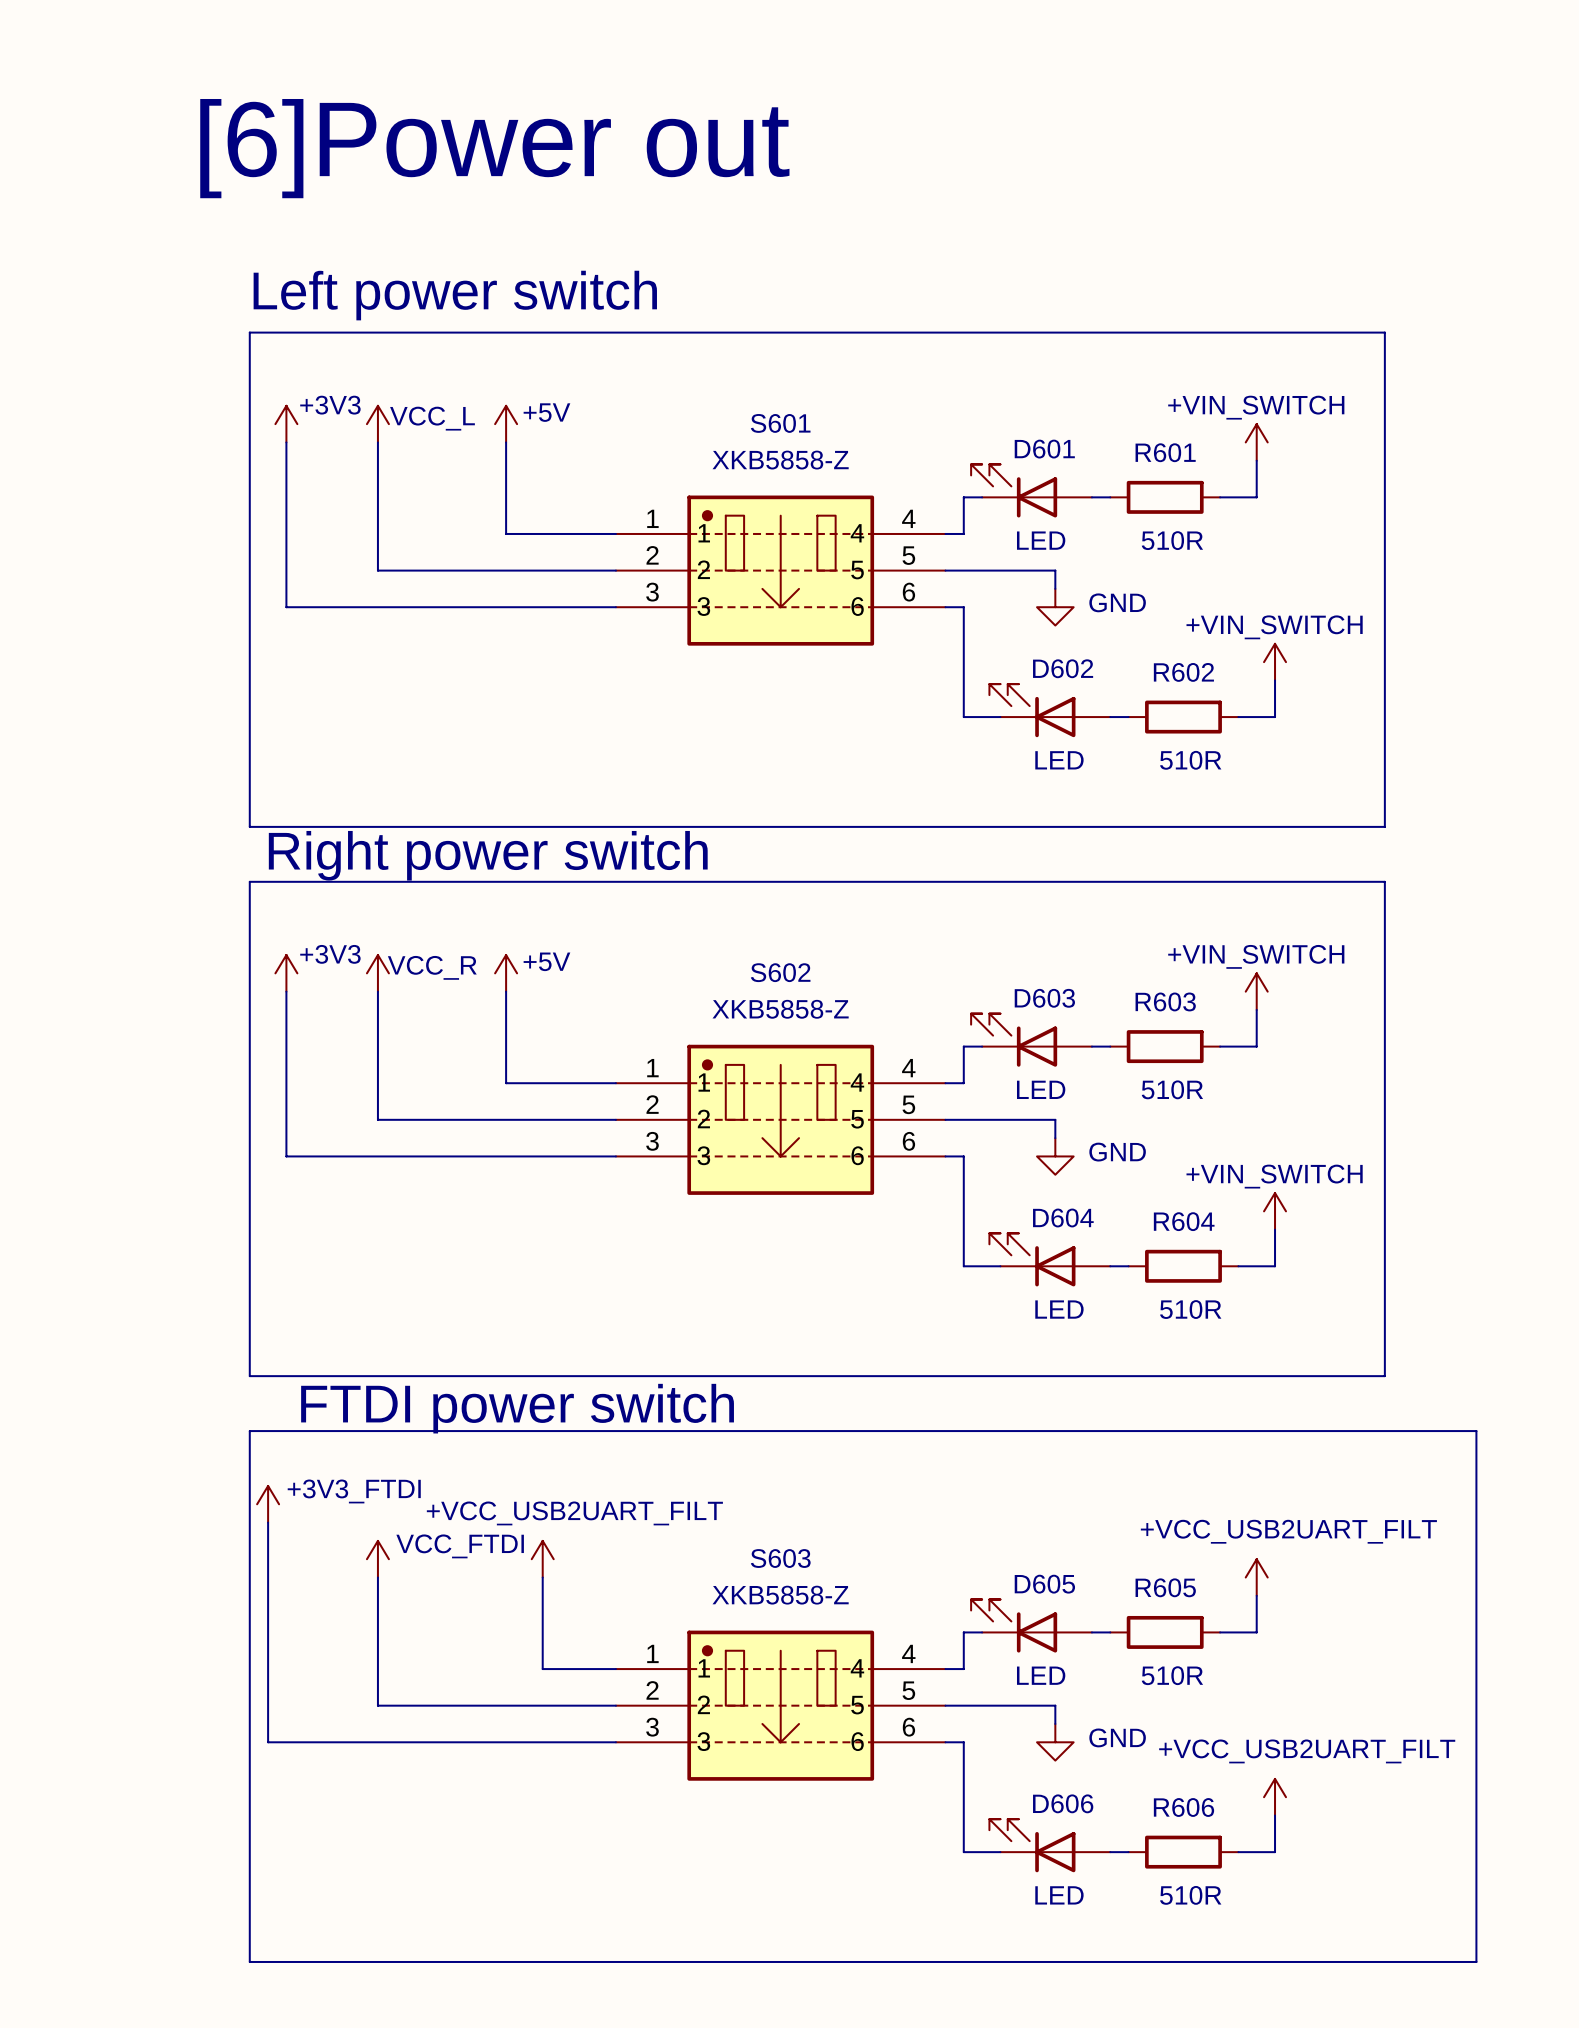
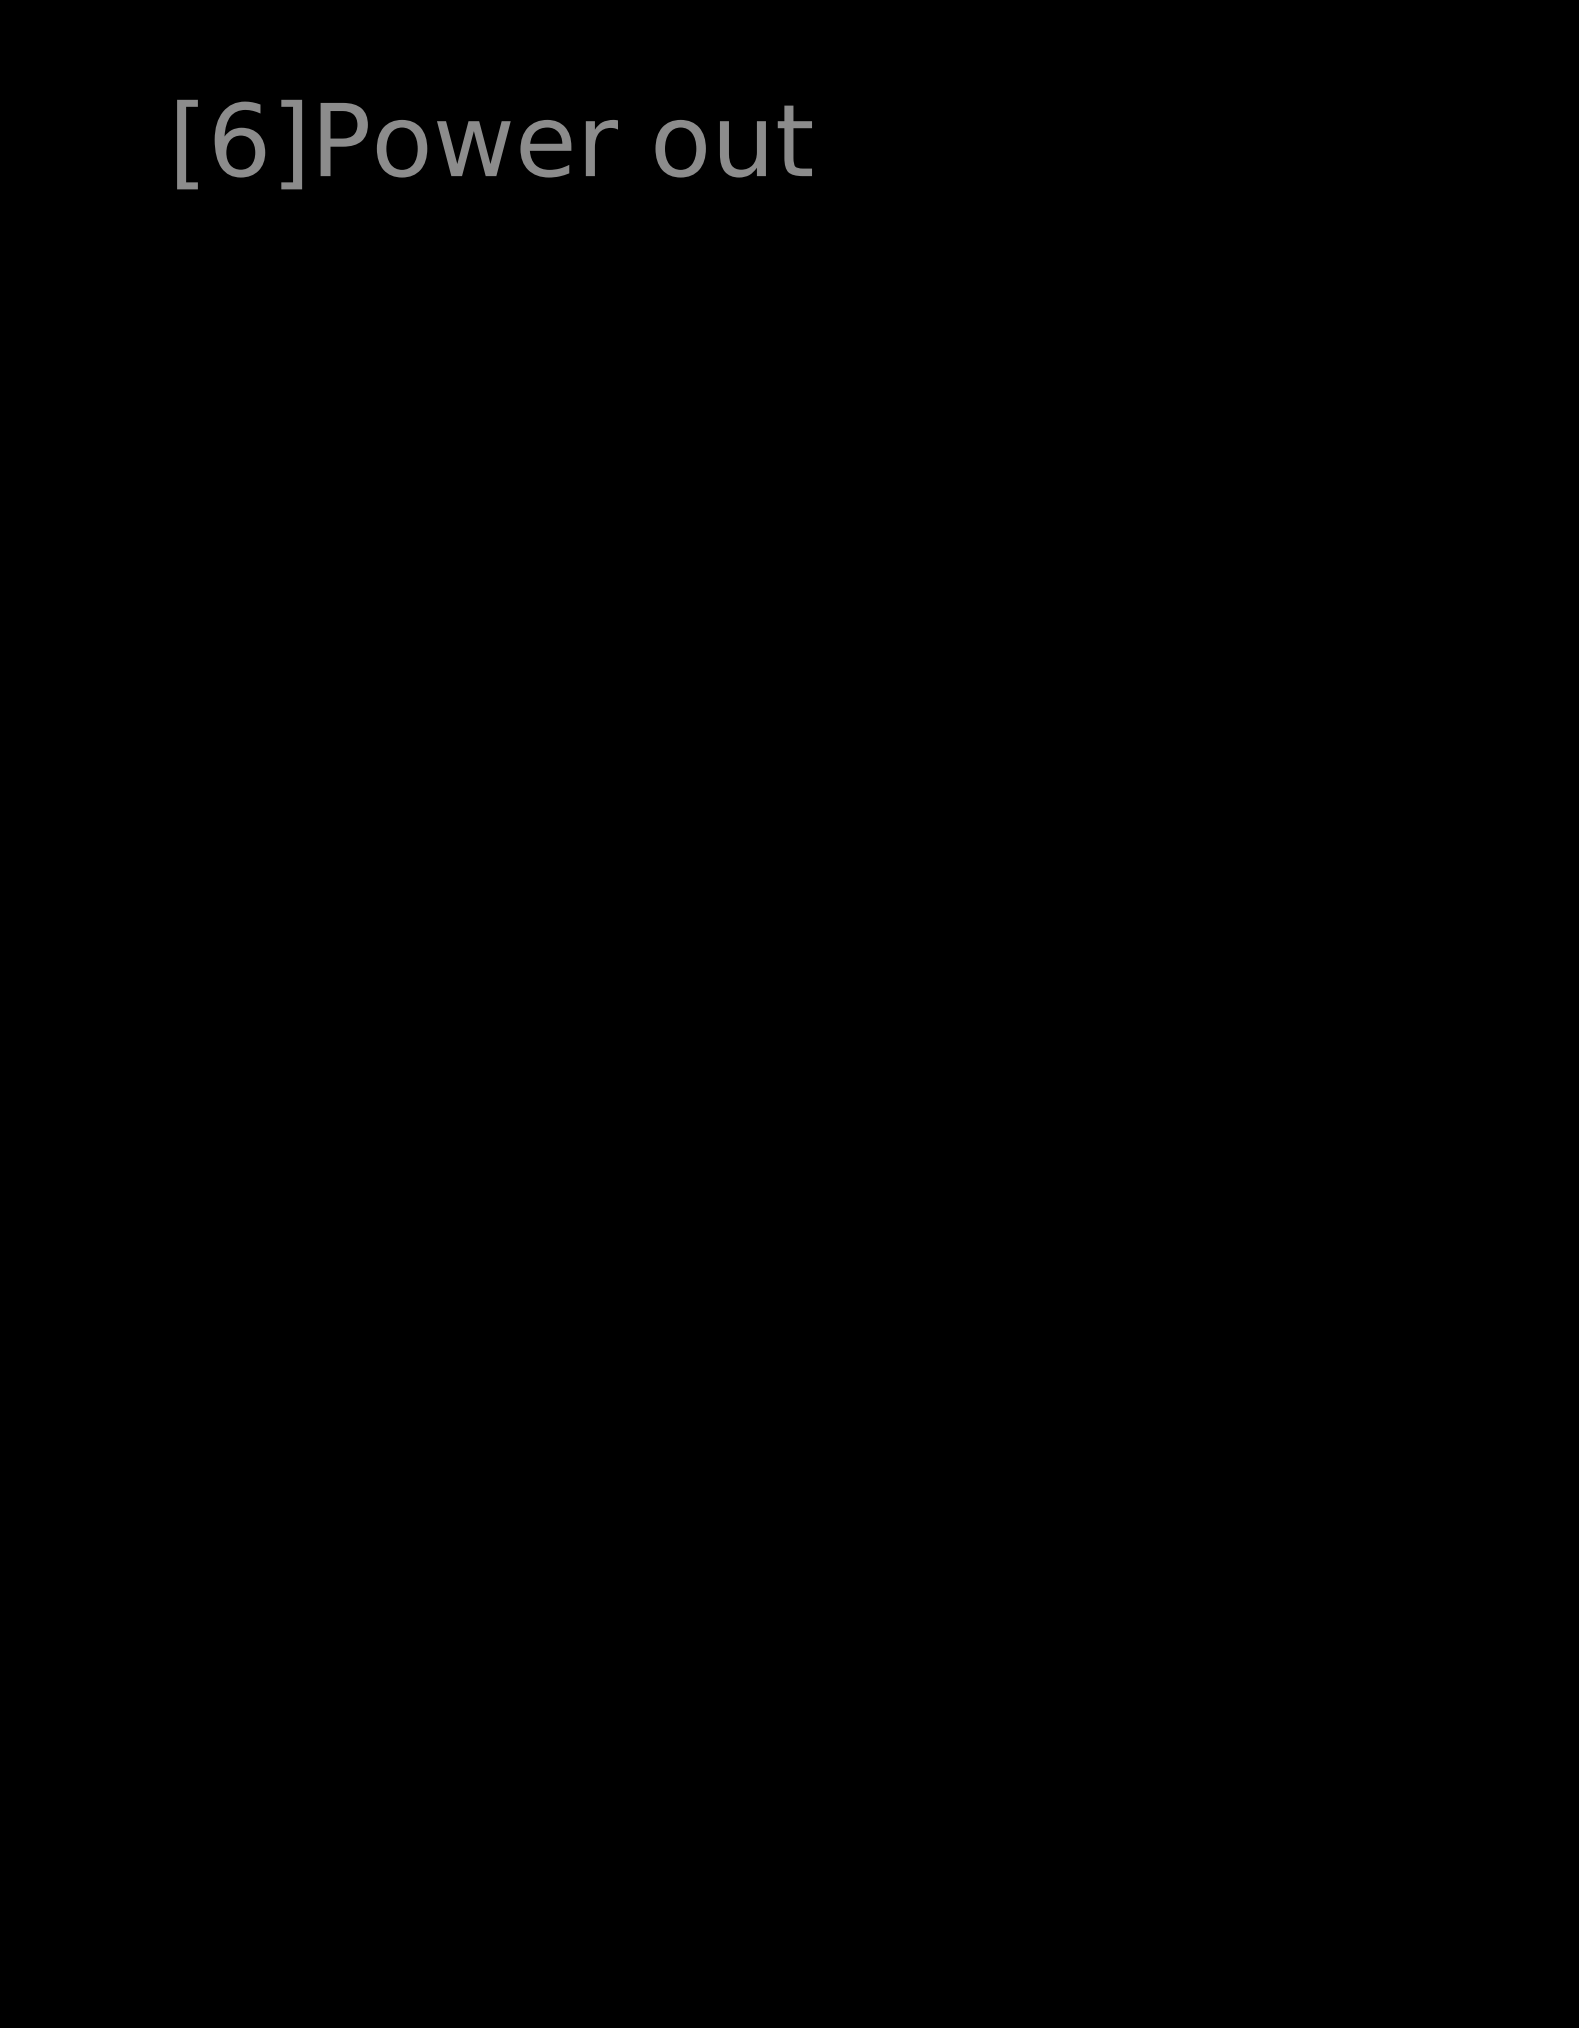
text: Left power switch (455, 295) -> none
line: (249, 332) (249, 826) (1384, 826) (1384, 332) (249, 332) -> none
power symbol: +3V3 (286, 424) -> none
power symbol: VCC_L (377, 424) -> none
power symbol: +5V (506, 424) -> none
wire: (286, 442) (286, 607) (615, 607) -> none
wire: (377, 442) (377, 570) (615, 570) -> none
wire: (506, 442) (506, 533) (615, 533) -> none
power symbol: +VIN_SWITCH (1256, 442) -> none
wire: (1256, 460) (1256, 497) (1220, 497) -> none
D601: LED (1031, 490) -> none
wire: (982, 497) (963, 497) (963, 533) (945, 533) -> none
wire: (1091, 497) (1110, 497) -> none
R601: 510R (1165, 497) -> none
S601: XKB5858-Z (780, 570) -> none
wire: (945, 570) (1055, 570) (1055, 588) -> none
wire: (945, 607) (963, 607) (963, 717) (1000, 717) -> none
power symbol: GND (1055, 607) -> none
power symbol: +VIN_SWITCH (1275, 662) -> none
wire: (1275, 680) (1275, 717) (1238, 717) -> none
D602: LED (1049, 710) -> none
wire: (1110, 717) (1128, 717) -> none
R602: 510R (1183, 717) -> none
text: Right power switch (488, 855) -> none
line: (249, 881) (249, 1376) (1384, 1376) (1384, 881) (249, 881) -> none
power symbol: +3V3 (286, 973) -> none
power symbol: VCC_R (377, 973) -> none
power symbol: +5V (506, 973) -> none
wire: (286, 991) (286, 1156) (615, 1156) -> none
wire: (377, 991) (377, 1119) (615, 1119) -> none
wire: (506, 991) (506, 1083) (615, 1083) -> none
power symbol: +VIN_SWITCH (1256, 991) -> none
wire: (1256, 1009) (1256, 1046) (1220, 1046) -> none
D603: LED (1031, 1040) -> none
wire: (982, 1046) (963, 1046) (963, 1083) (945, 1083) -> none
wire: (1091, 1046) (1110, 1046) -> none
R603: 510R (1165, 1046) -> none
S602: XKB5858-Z (780, 1119) -> none
wire: (945, 1119) (1055, 1119) (1055, 1138) -> none
wire: (945, 1156) (963, 1156) (963, 1266) (1000, 1266) -> none
power symbol: GND (1055, 1156) -> none
power symbol: +VIN_SWITCH (1275, 1211) -> none
wire: (1275, 1229) (1275, 1266) (1238, 1266) -> none
D604: LED (1049, 1259) -> none
wire: (1110, 1266) (1128, 1266) -> none
R604: 510R (1183, 1266) -> none
text: FTDI power switch (517, 1408) -> none
line: (249, 1431) (1476, 1431) (1476, 1961) (249, 1961) (249, 1431) -> none
power symbol: +3V3_FTDI (268, 1504) -> none
wire: (268, 1522) (268, 1742) (615, 1742) -> none
power symbol: VCC_FTDI (377, 1559) -> none
power symbol: +VCC_USB2UART_FILT (542, 1559) -> none
wire: (377, 1577) (377, 1705) (615, 1705) -> none
wire: (542, 1577) (542, 1669) (615, 1669) -> none
power symbol: +VCC_USB2UART_FILT (1256, 1577) -> none
wire: (1256, 1595) (1256, 1632) (1220, 1632) -> none
D605: LED (1031, 1626) -> none
wire: (982, 1632) (963, 1632) (963, 1669) (945, 1669) -> none
wire: (1091, 1632) (1110, 1632) -> none
R605: 510R (1165, 1632) -> none
S603: XKB5858-Z (780, 1705) -> none
wire: (945, 1705) (1055, 1705) (1055, 1723) -> none
wire: (945, 1742) (963, 1742) (963, 1852) (1000, 1852) -> none
power symbol: GND (1055, 1742) -> none
power symbol: +VCC_USB2UART_FILT (1275, 1797) -> none
wire: (1275, 1815) (1275, 1852) (1238, 1852) -> none
D606: LED (1049, 1845) -> none
wire: (1110, 1852) (1128, 1852) -> none
R606: 510R (1183, 1852) -> none

